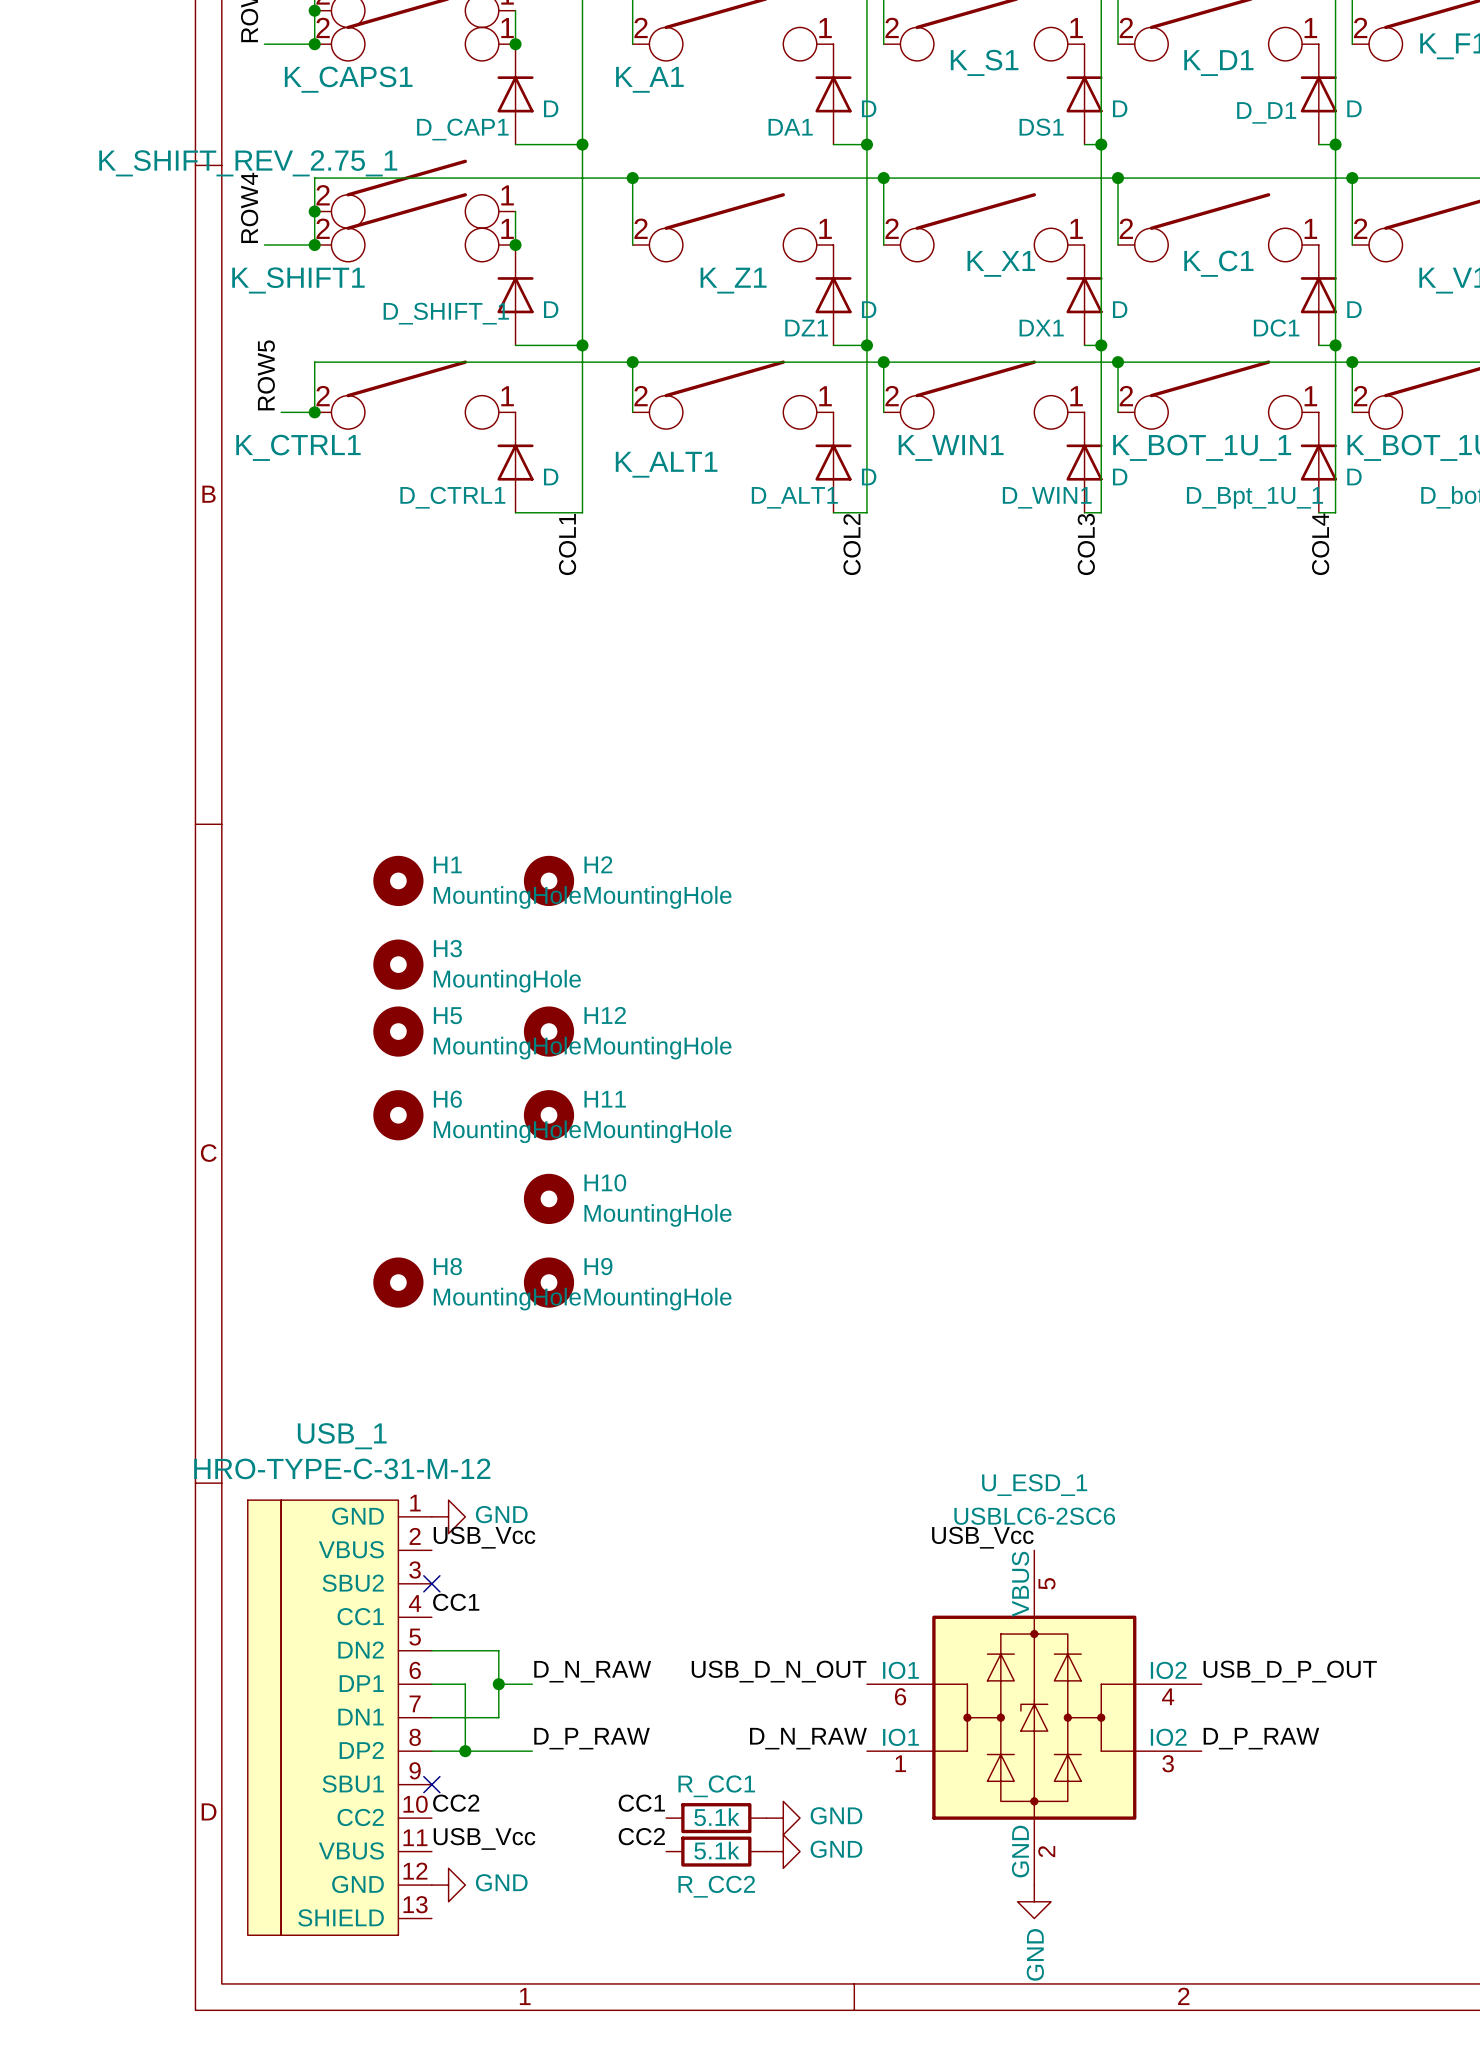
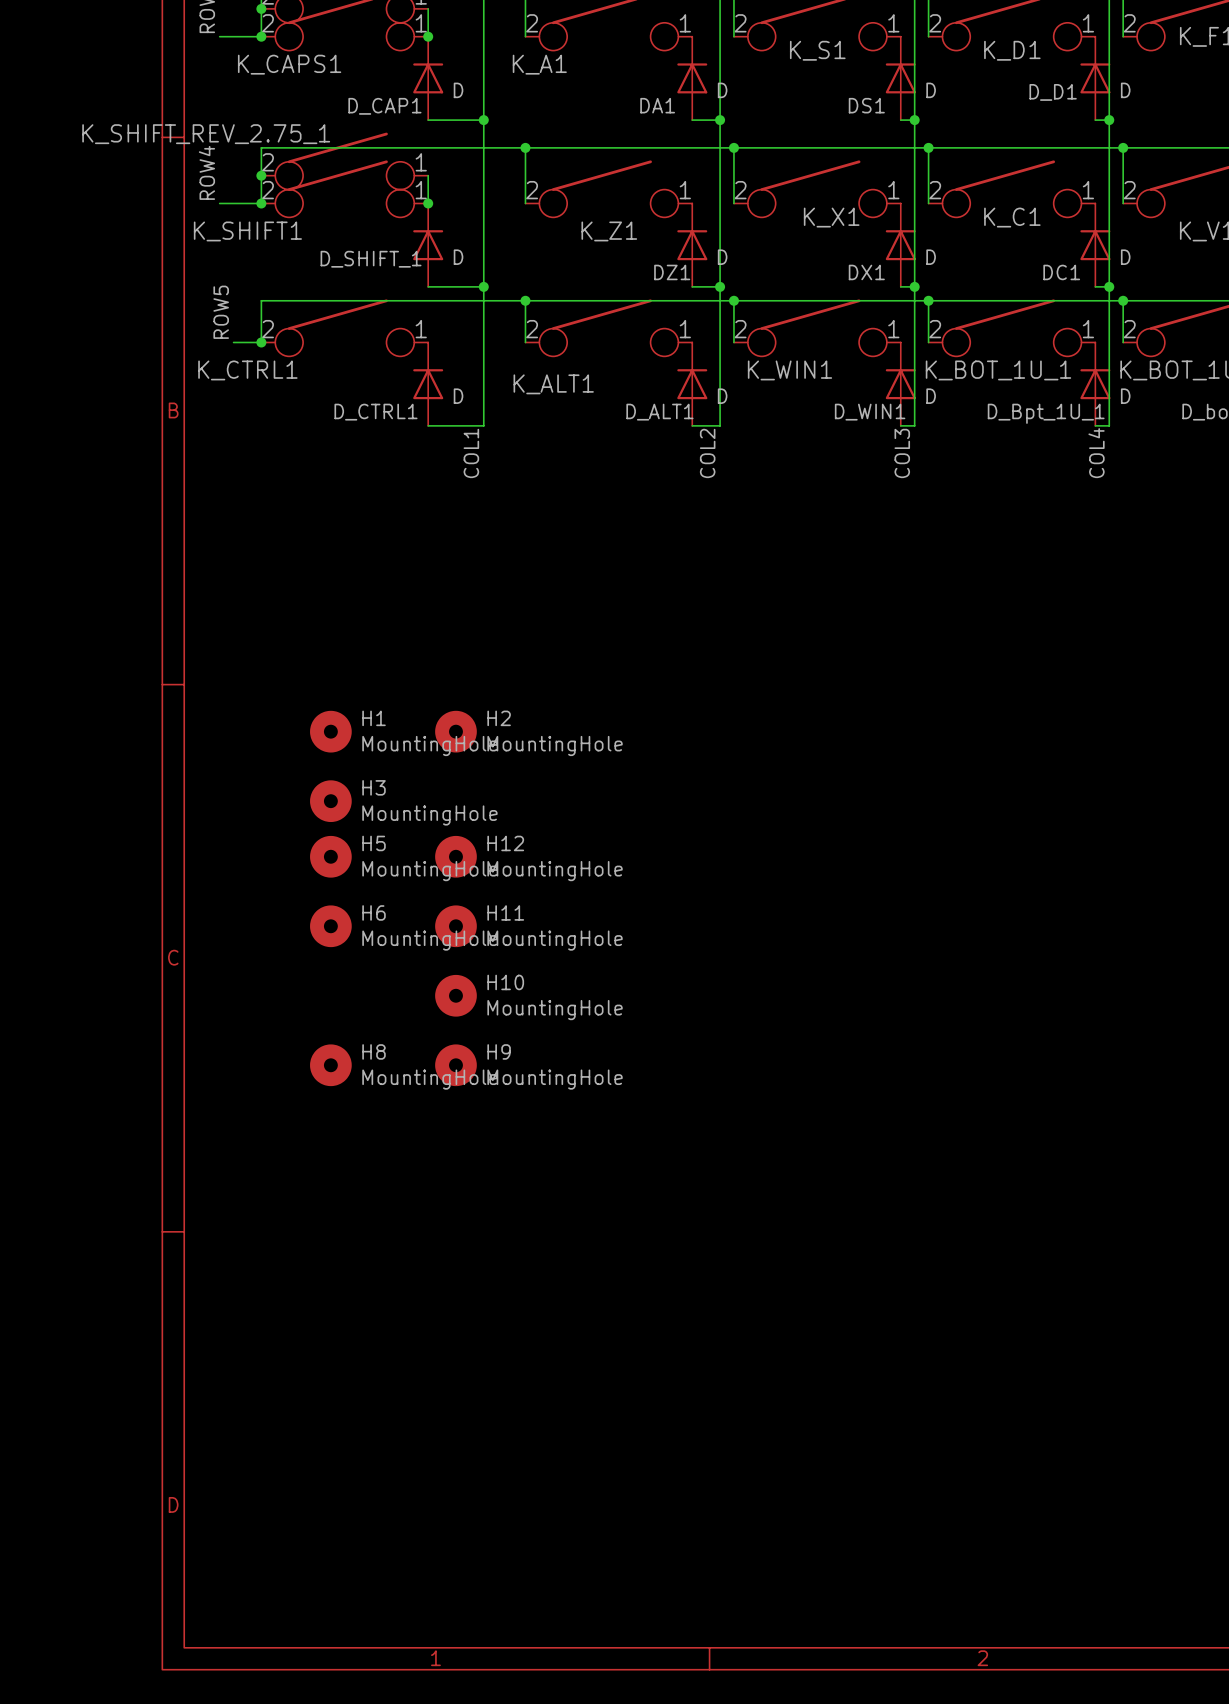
power symbol: GND (448, 1516) -> none
label: USB_Vcc (484, 1537) -> none
label: USB_Vcc (982, 1537) -> none
no-connect mark: (431, 1583) -> none
label: CC1 (456, 1602) -> none
wire: (431, 1650) (498, 1650) (498, 1717) (431, 1717) -> none
label: D_N_RAW (592, 1671) -> none
label: USB_D_N_OUT (779, 1671) -> none
label: USB_D_P_OUT (1290, 1671) -> none
wire: (431, 1684) (465, 1684) (465, 1751) -> none
wire: (498, 1684) (532, 1684) -> none
junction: (498, 1684) -> none
USB_1: HRO-TYPE-C-31-M-12 (339, 1717) -> none
U_ESD_1: USBLC6-2SC6 (1034, 1717) -> none
label: D_P_RAW (592, 1738) -> none
label: D_N_RAW (808, 1738) -> none
label: D_P_RAW (1261, 1738) -> none
wire: (431, 1751) (532, 1751) -> none
junction: (465, 1751) -> none
no-connect mark: (431, 1784) -> none
label: CC2 (456, 1803) -> none
label: CC1 (641, 1803) -> none
R_CC1: 5.1k (716, 1818) -> none
power symbol: GND (783, 1818) -> none
label: CC2 (641, 1836) -> none
label: USB_Vcc (484, 1838) -> none
R_CC2: 5.1k (716, 1851) -> none
power symbol: GND (783, 1851) -> none
power symbol: GND (448, 1885) -> none
power symbol: GND (1034, 1901) -> none

